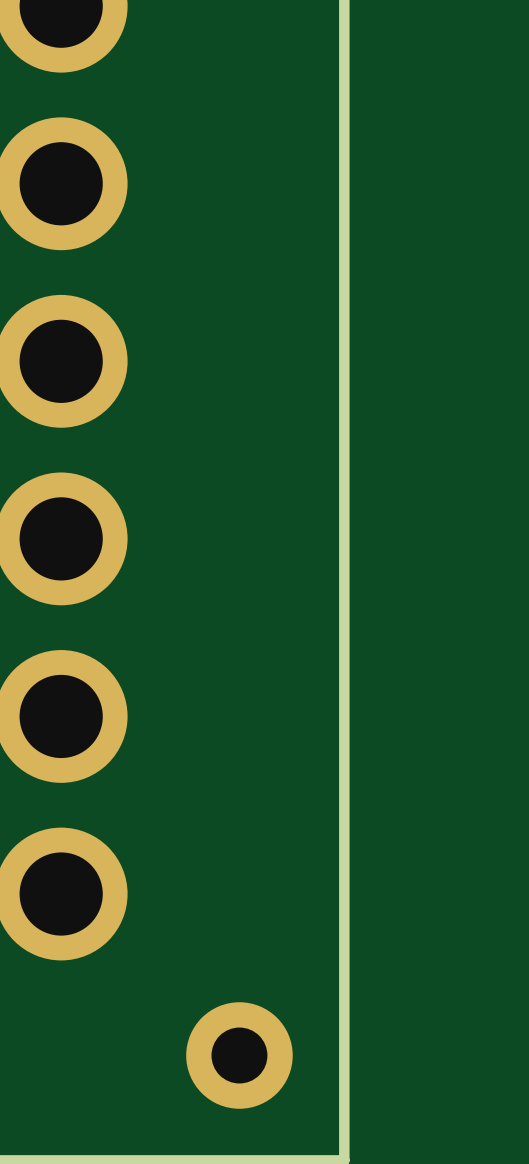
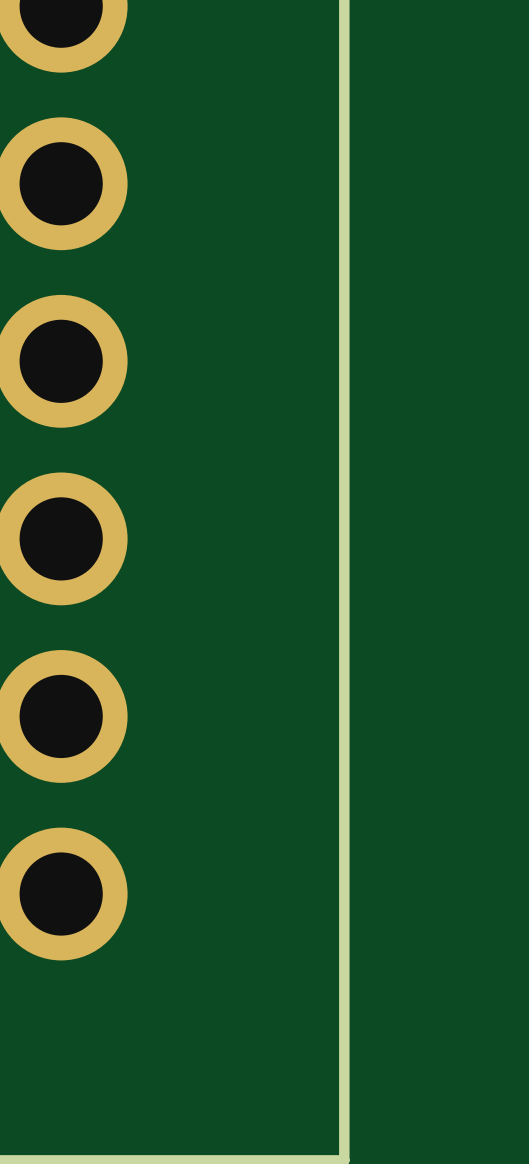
part: (239, 1055) -> none

